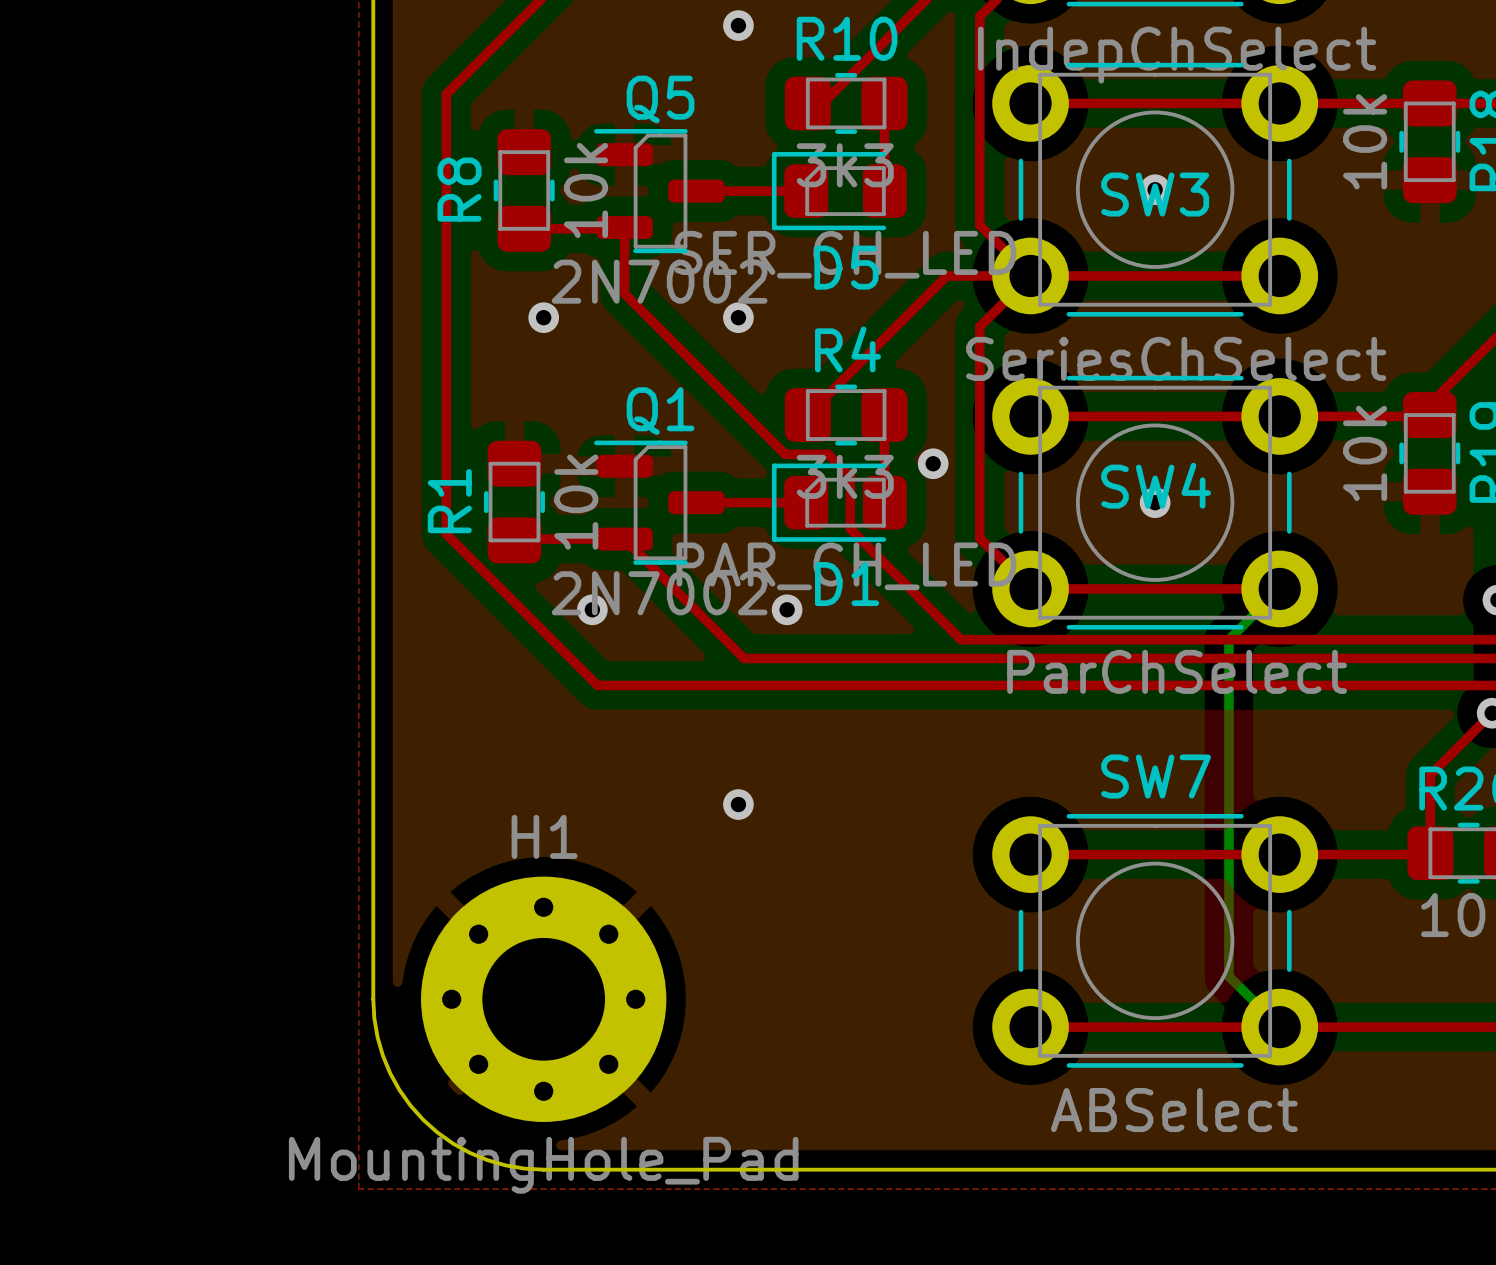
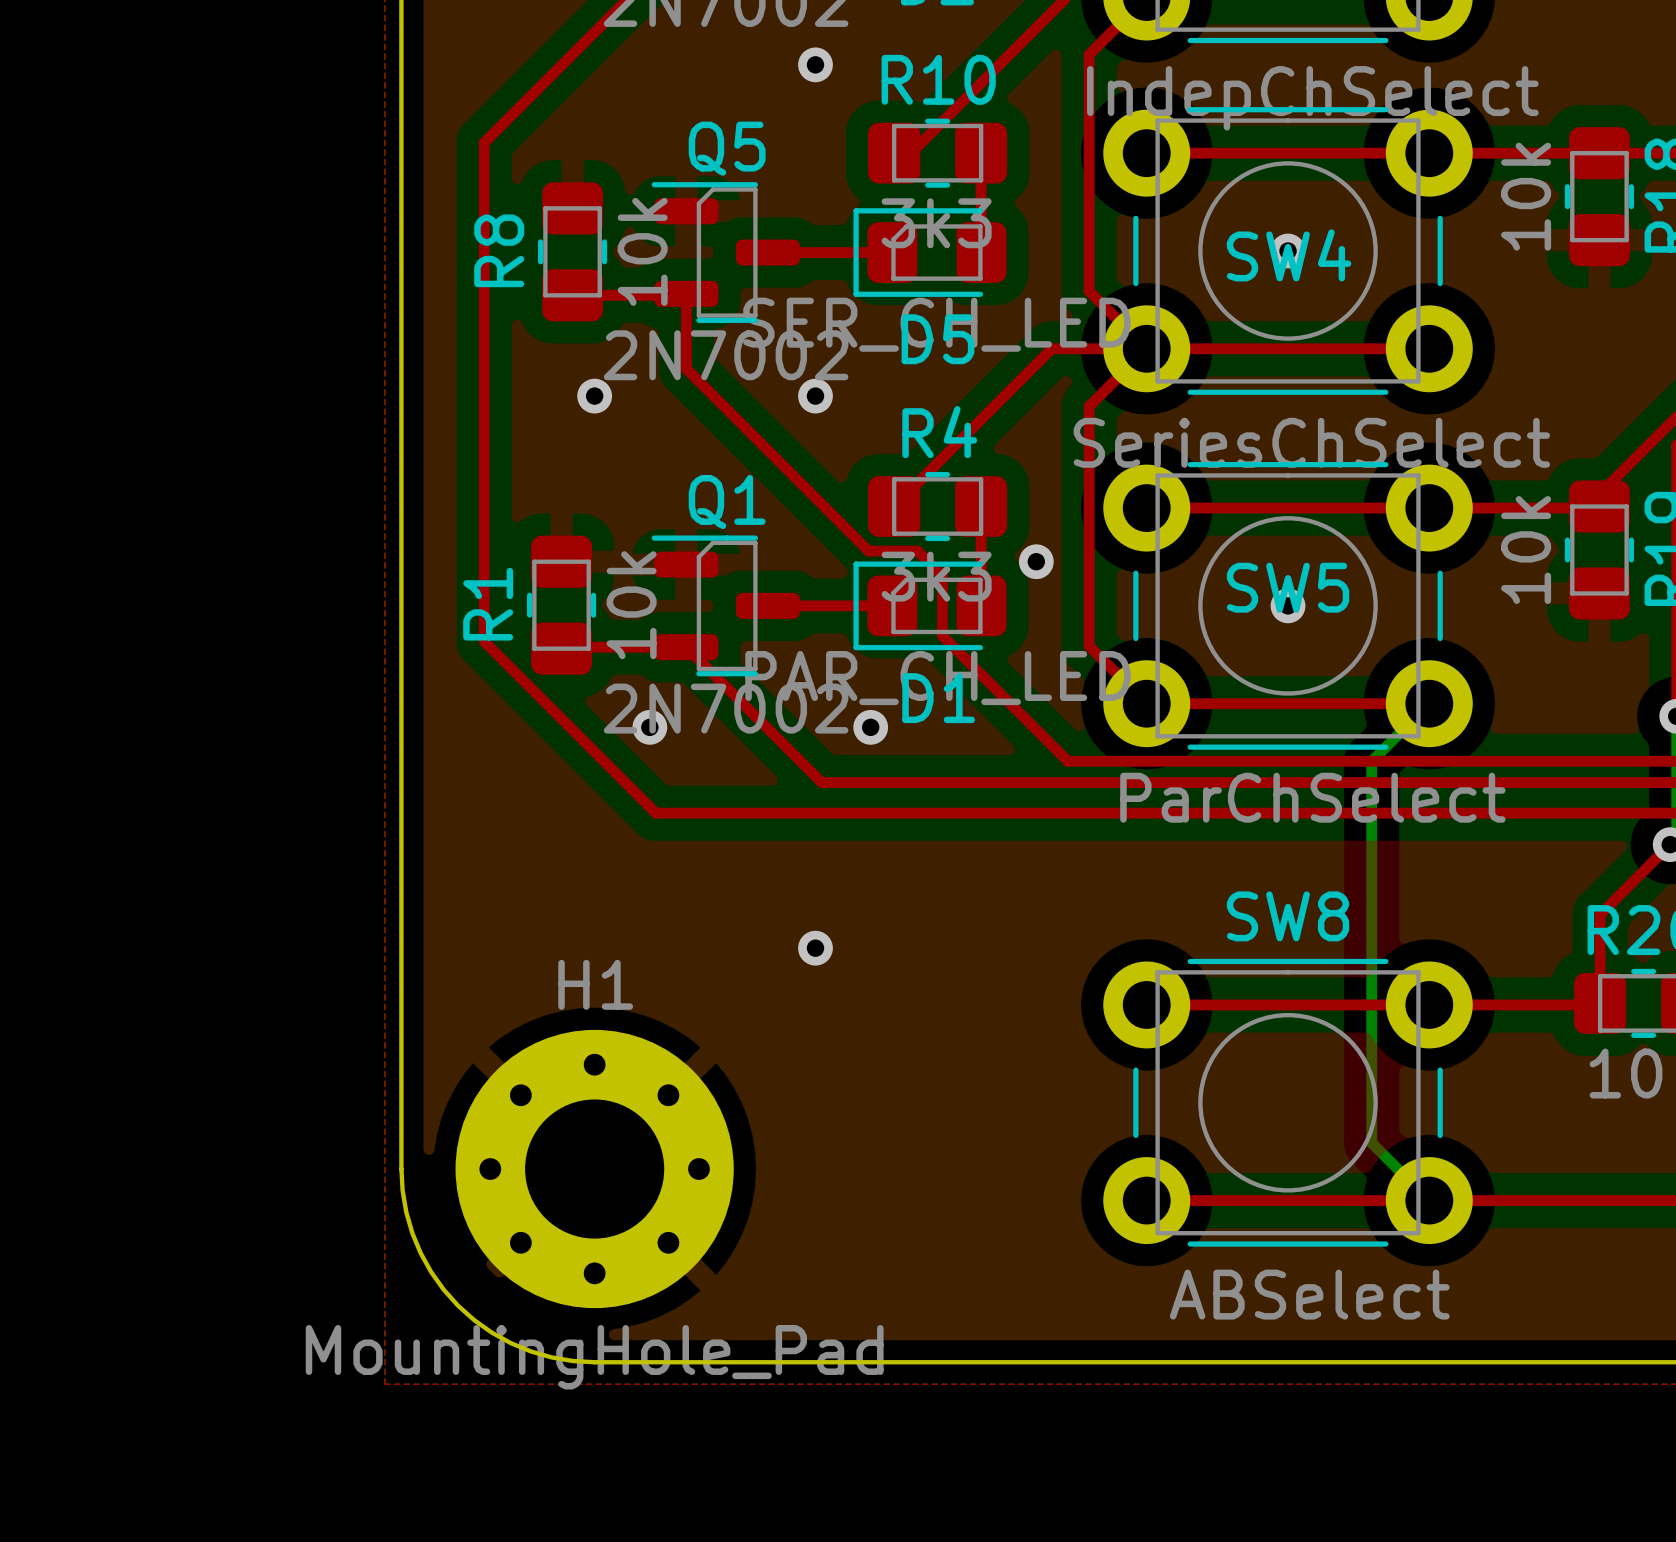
SW3 name: SW3 (1155, 194) -> SW4 (1289, 255)
SW4 name: SW4 (1156, 485) -> SW5 (1288, 587)
SW7 name: SW7 (1156, 776) -> SW8 (1288, 916)

